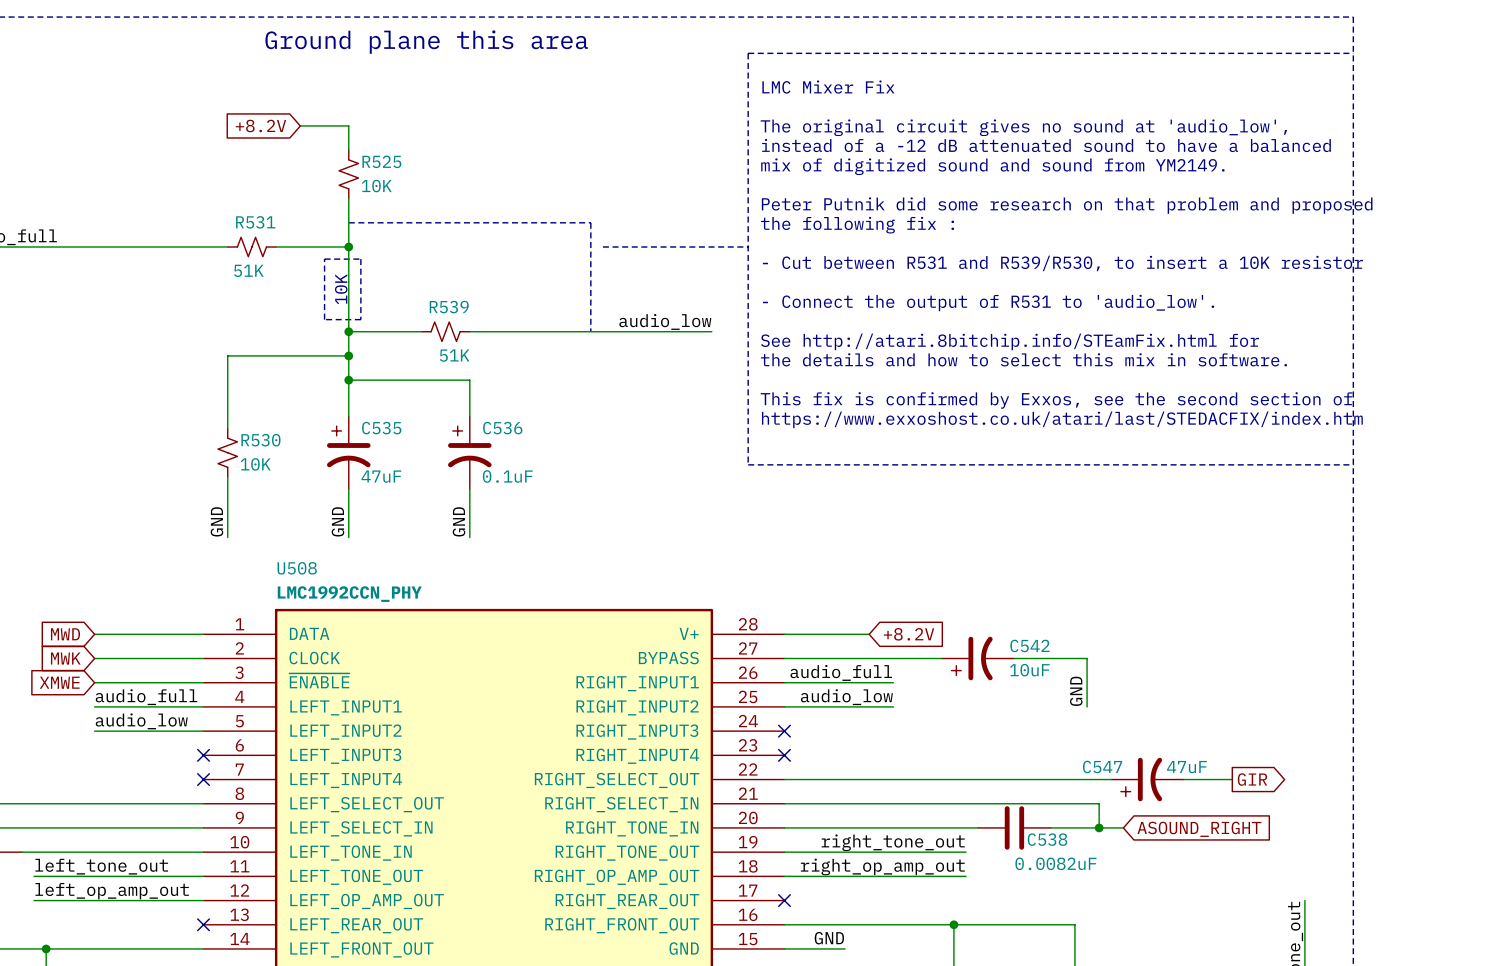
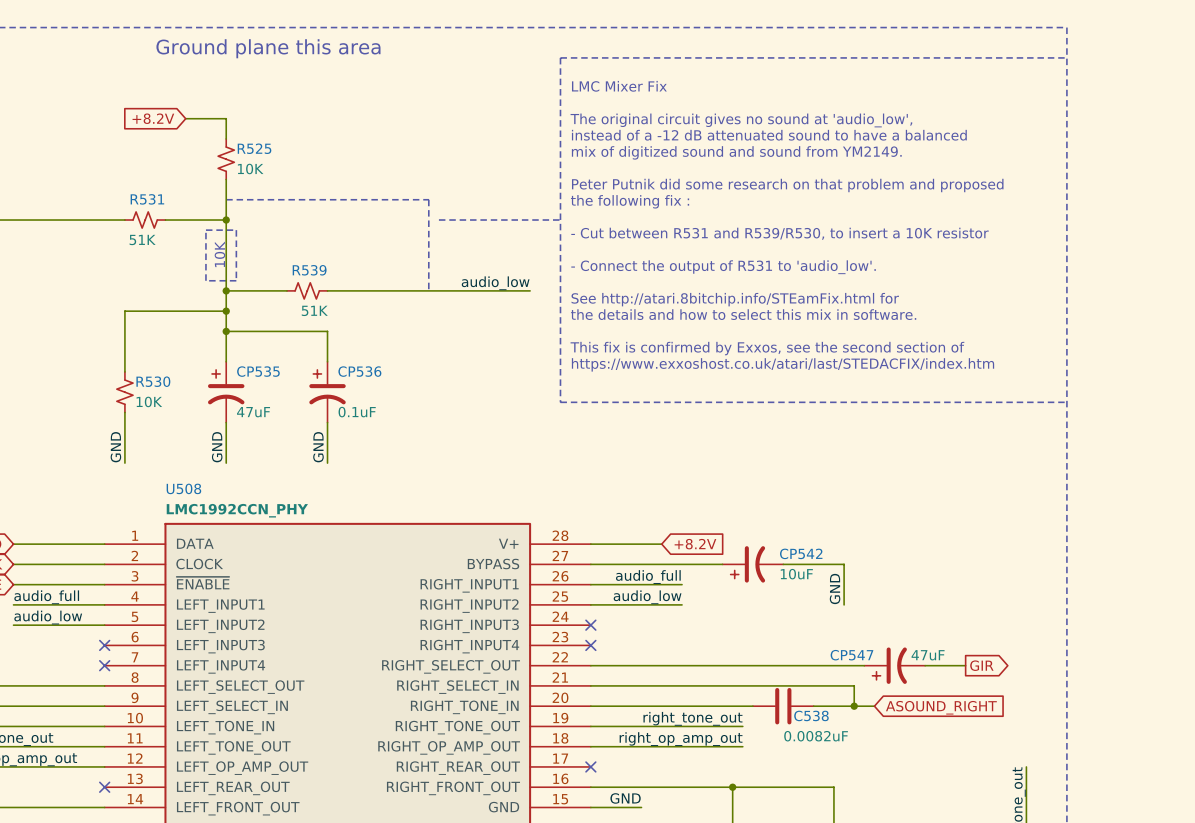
C535 name: C535 (381, 428) -> CP535 (258, 371)
C536 name: C536 (502, 428) -> CP536 (359, 371)
C542 name: C542 (1030, 645) -> CP542 (801, 553)
C547 name: C547 (1102, 766) -> CP547 (851, 655)

